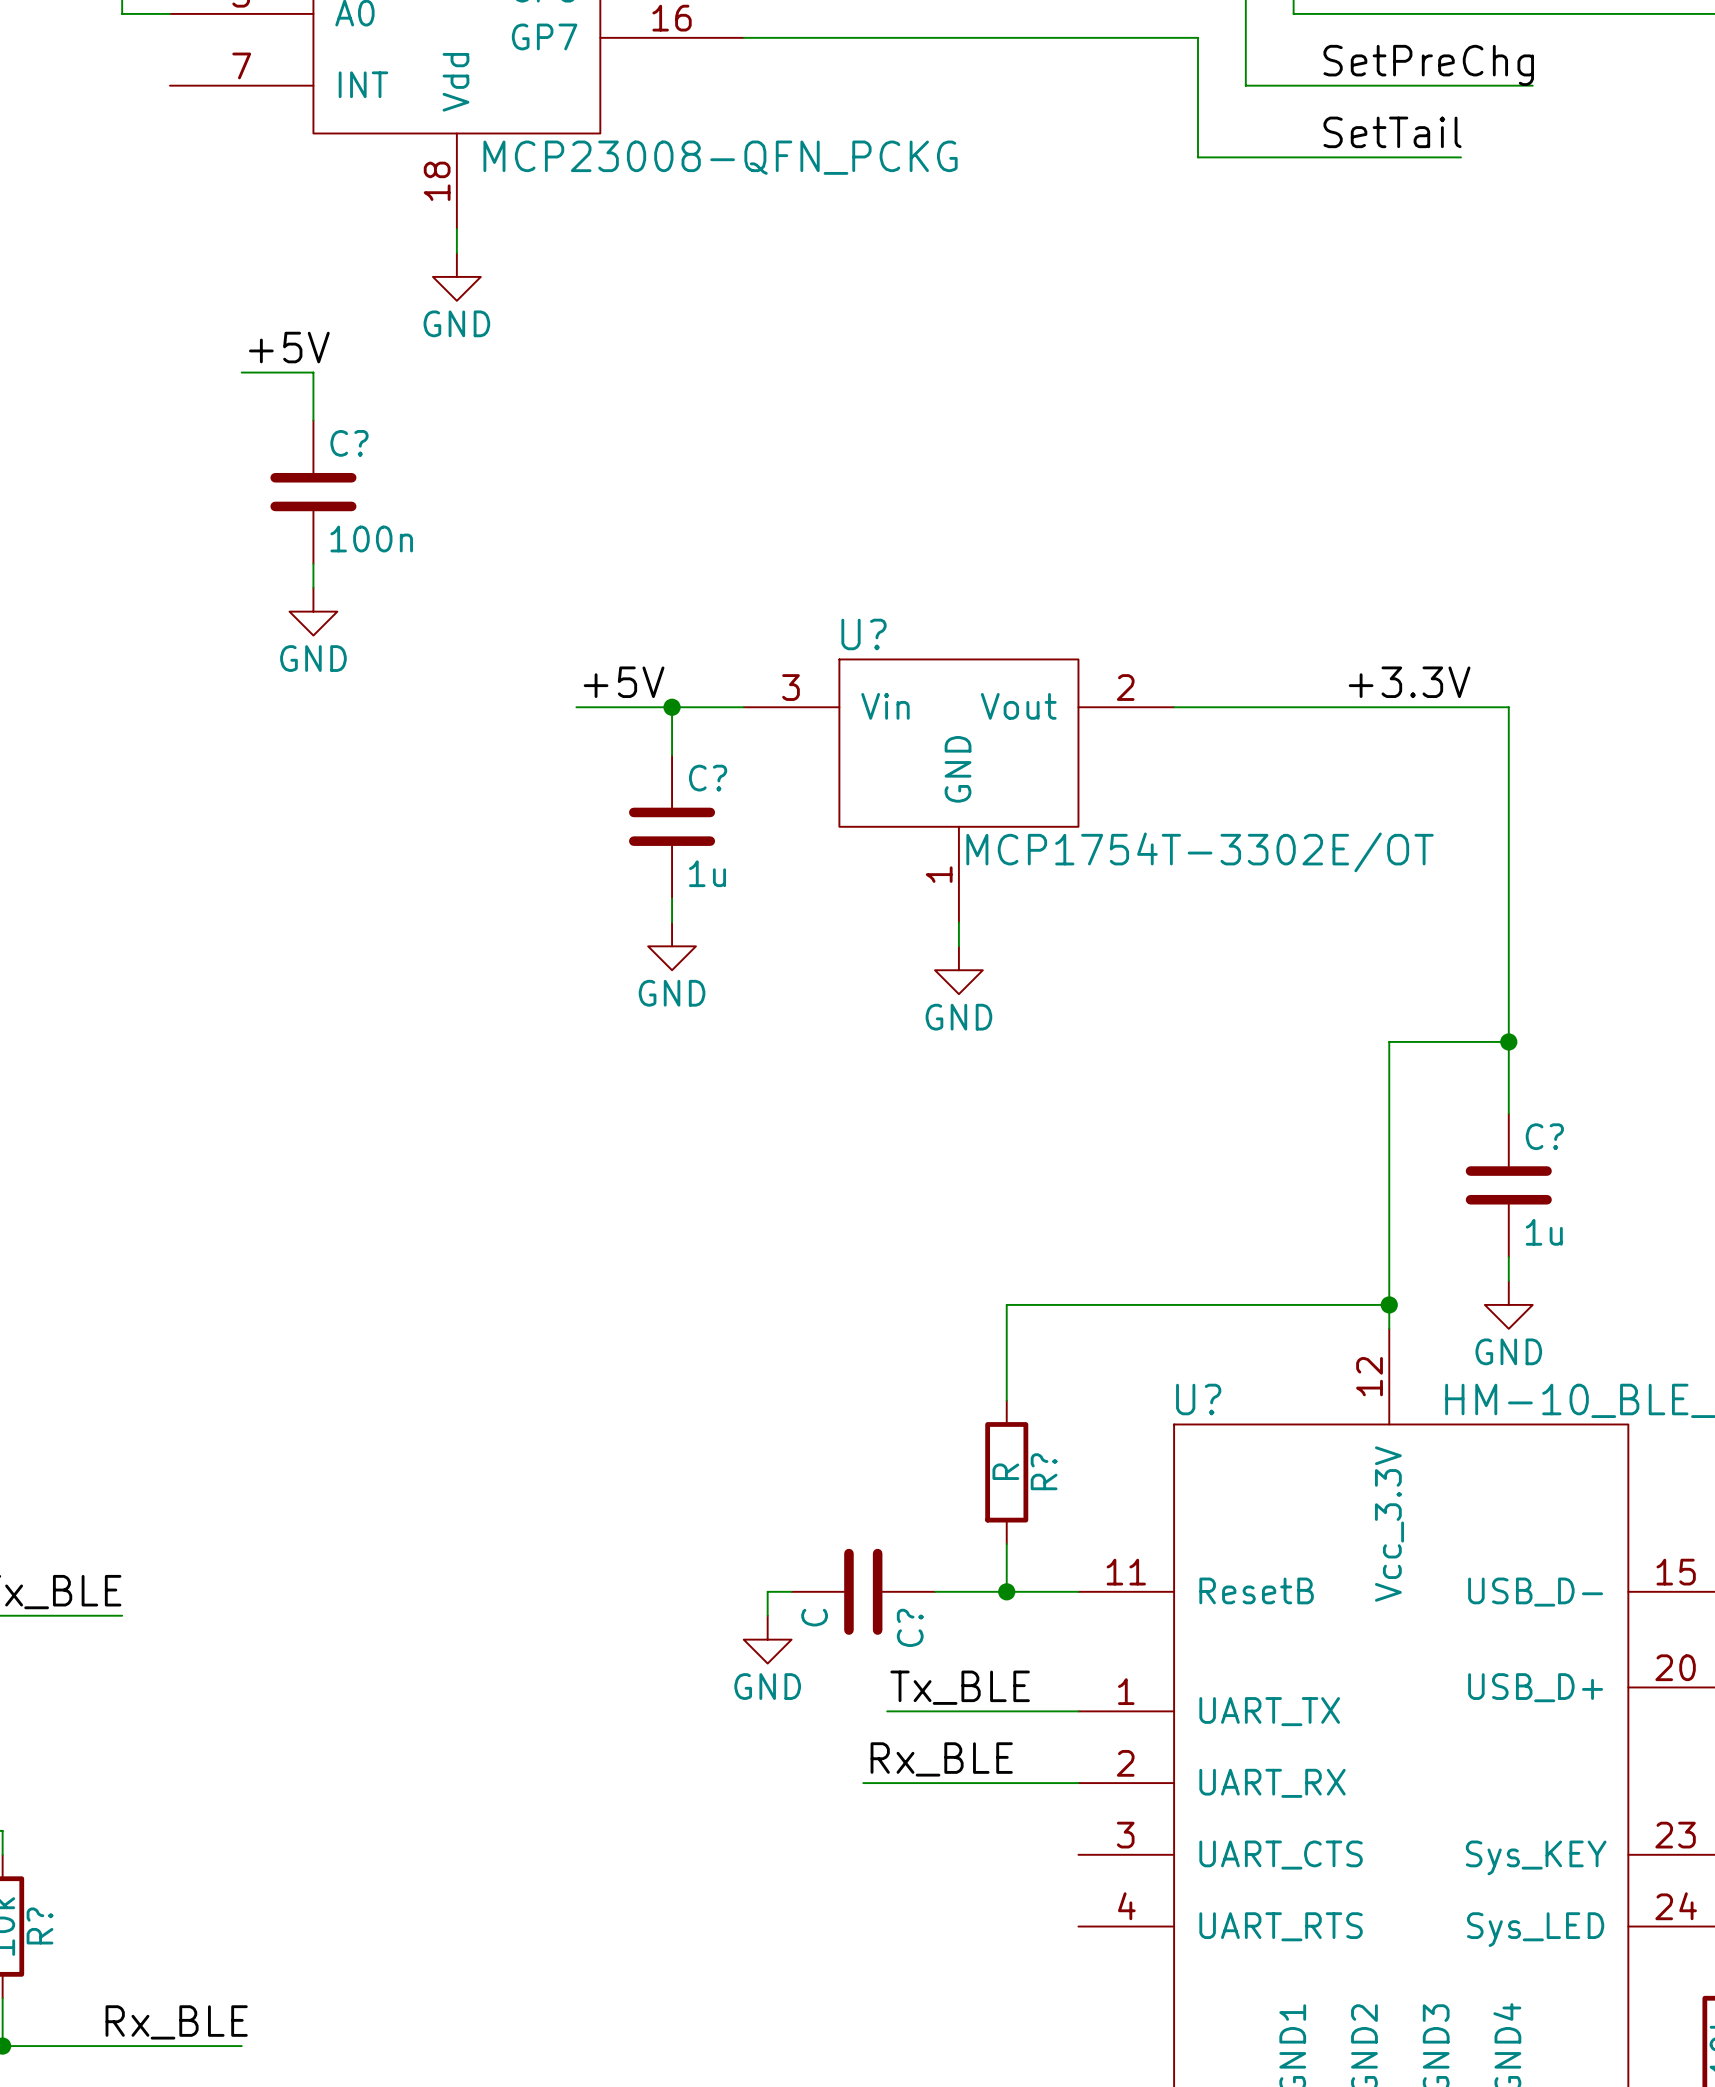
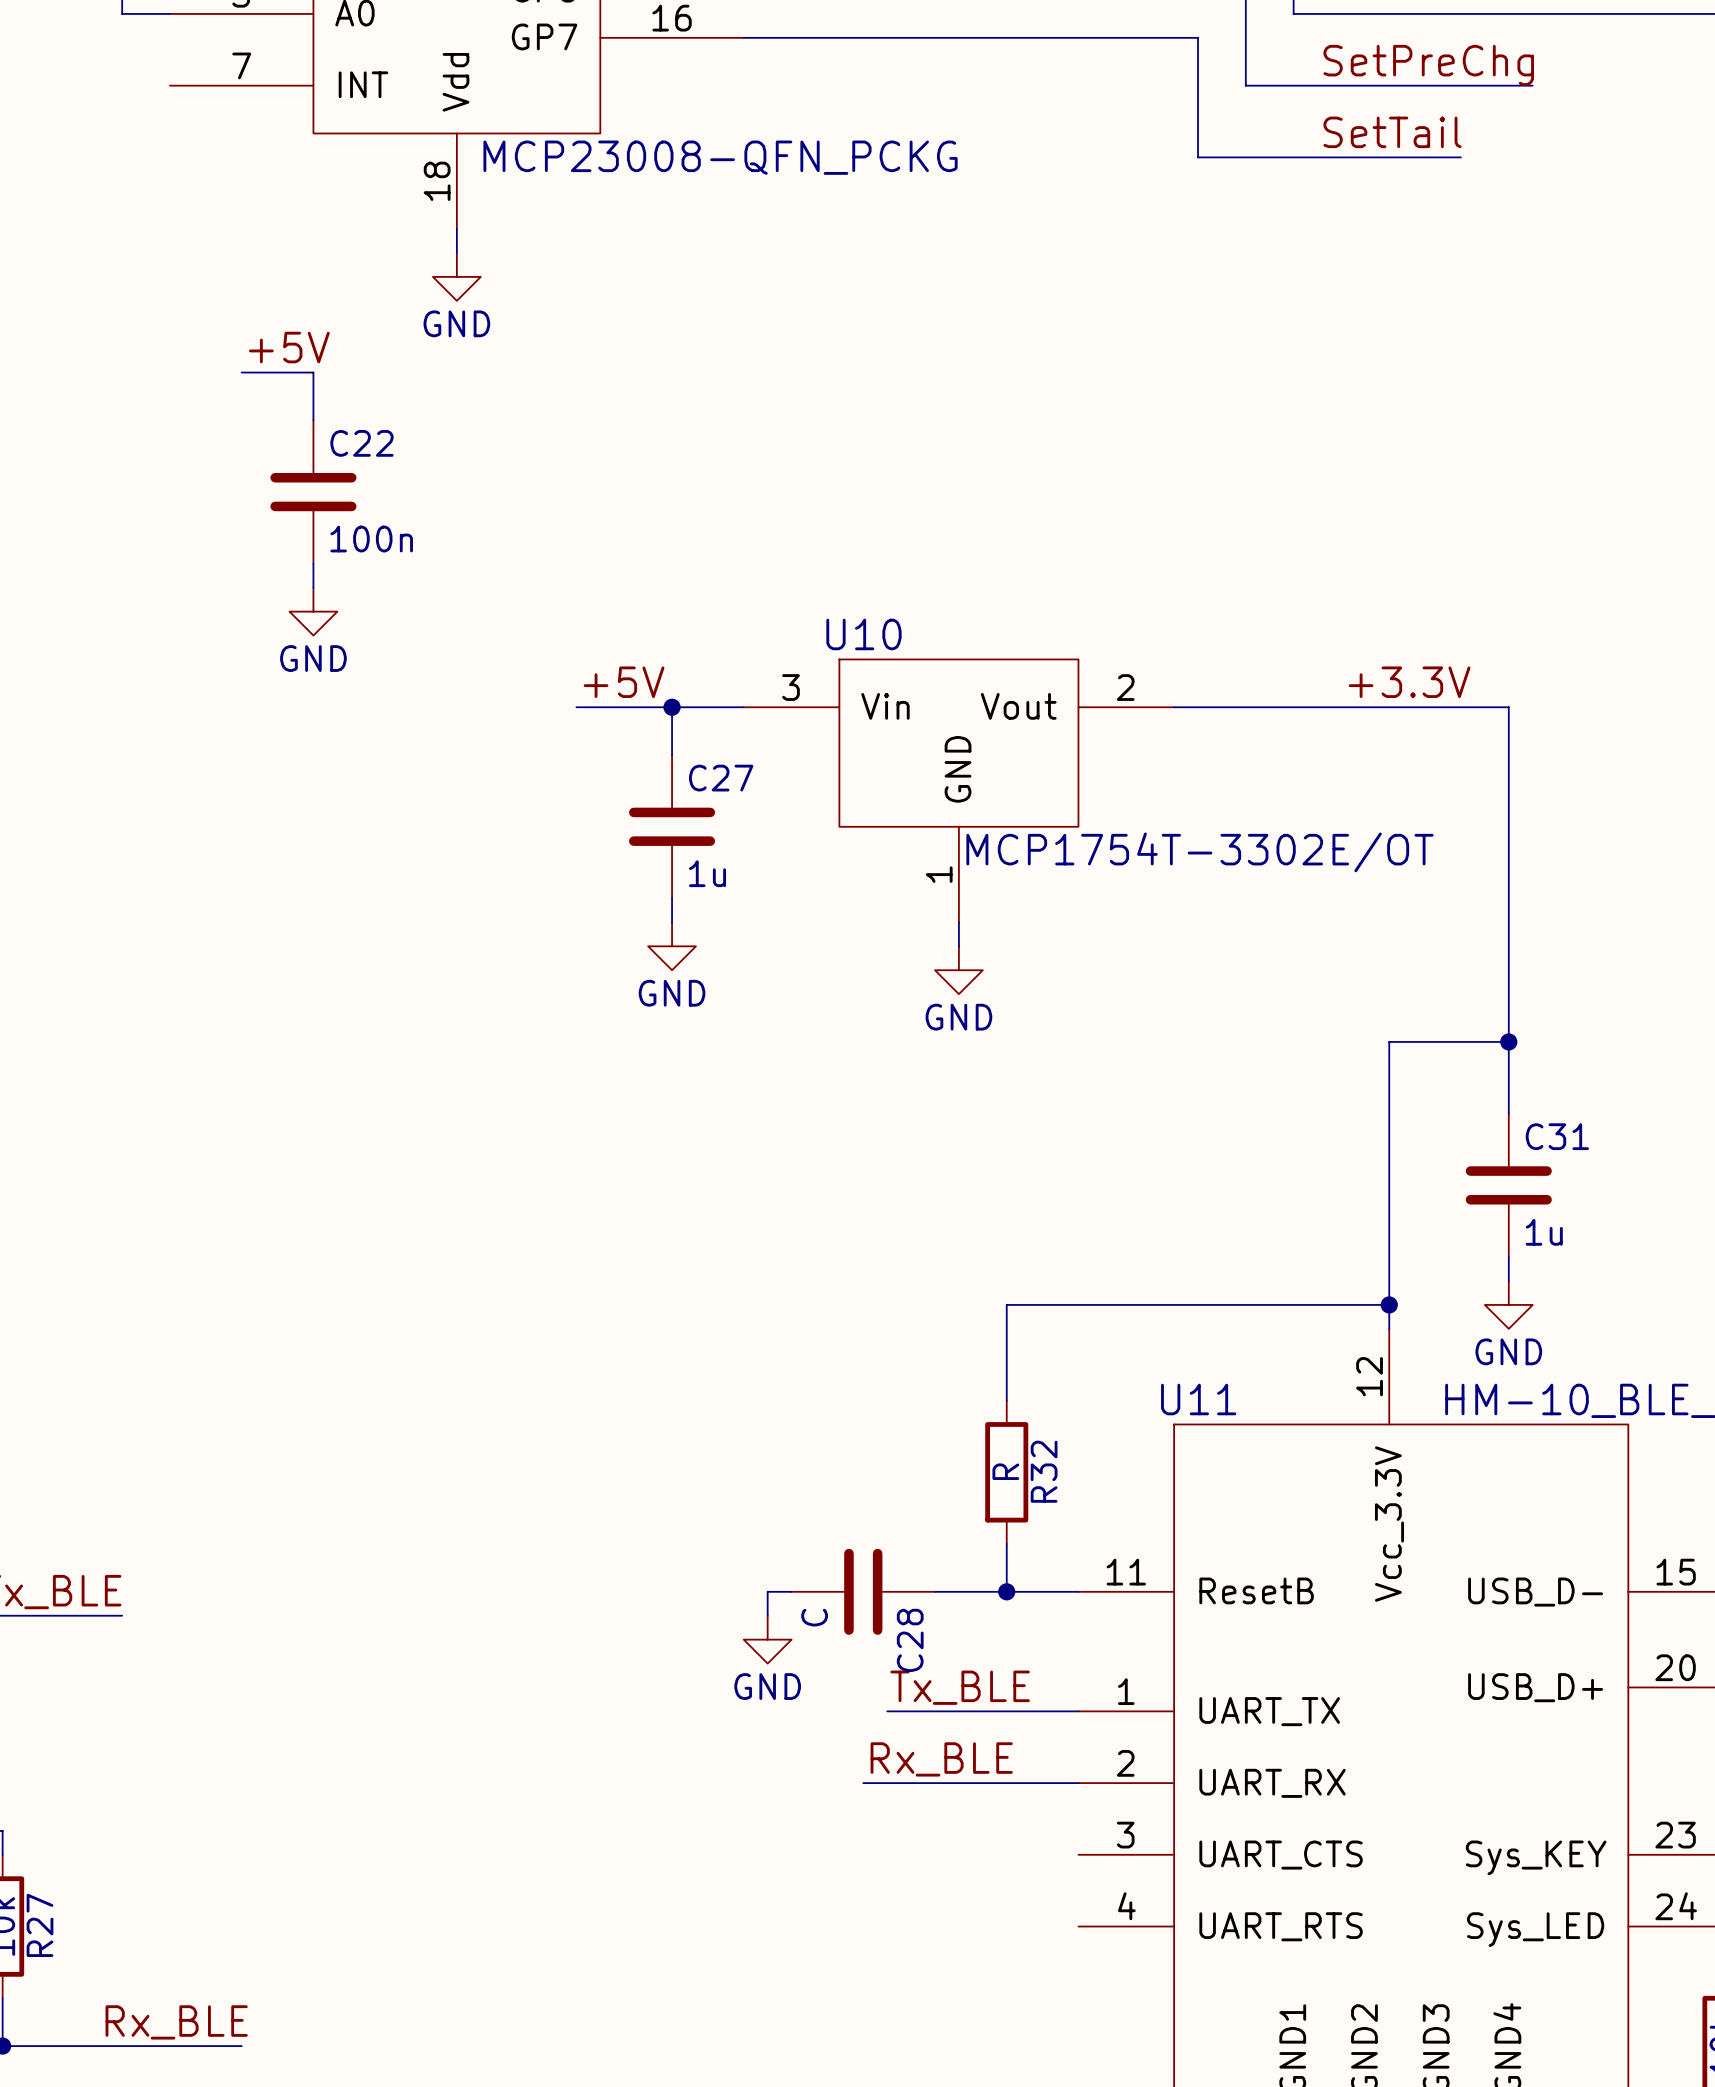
C? name: C? (349, 443) -> C22 (361, 443)
U? name: U? (863, 634) -> U10 (863, 634)
C? name: C? (708, 778) -> C27 (721, 778)
C? name: C? (1544, 1136) -> C31 (1557, 1136)
U? name: U? (1198, 1399) -> U11 (1198, 1399)
R? name: R? (1044, 1471) -> R32 (1044, 1471)
C? name: C? (910, 1627) -> C28 (910, 1640)
R? name: R? (39, 1925) -> R27 (39, 1925)

